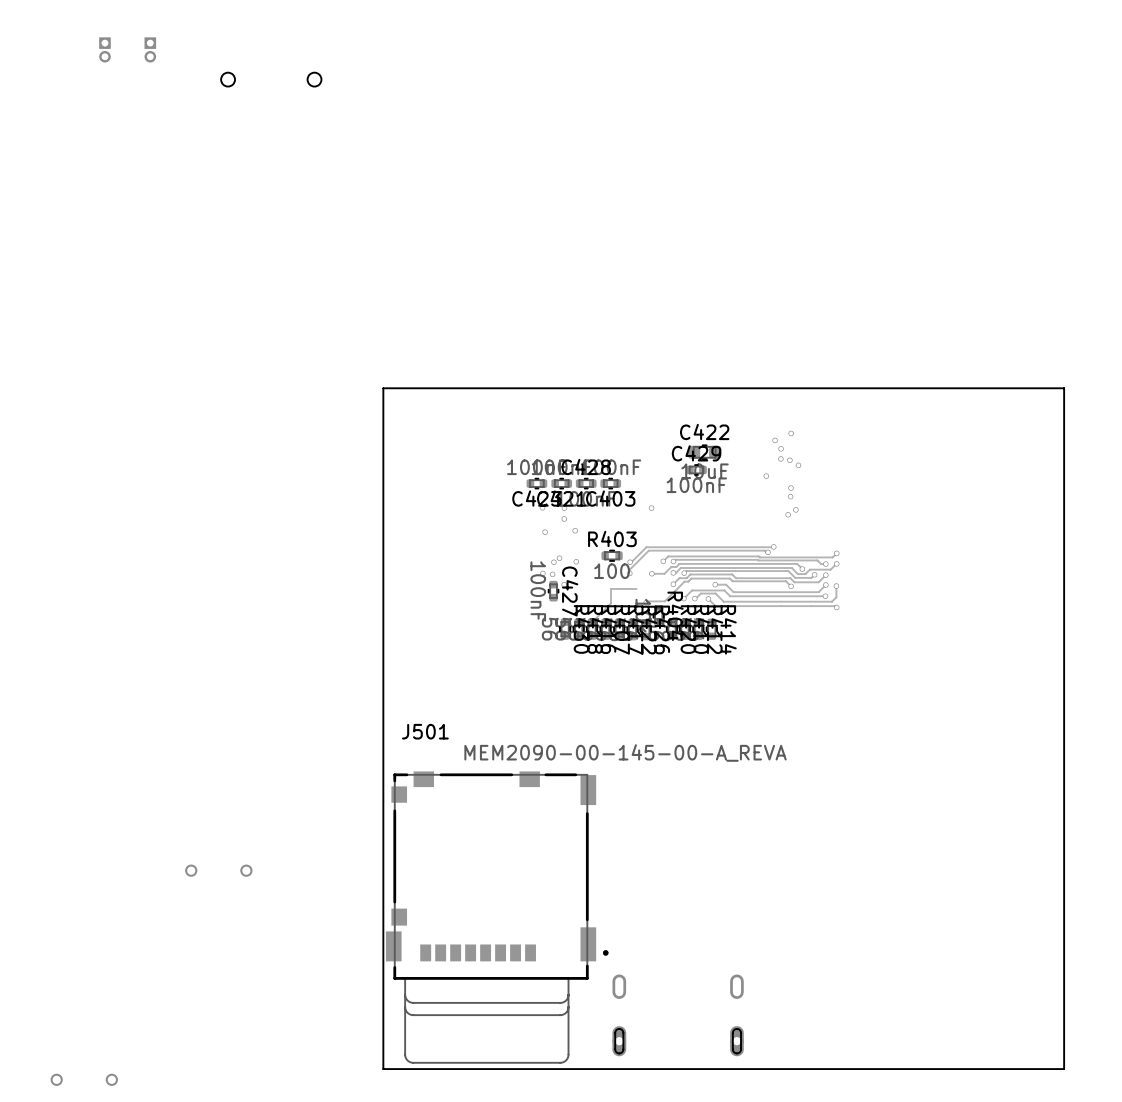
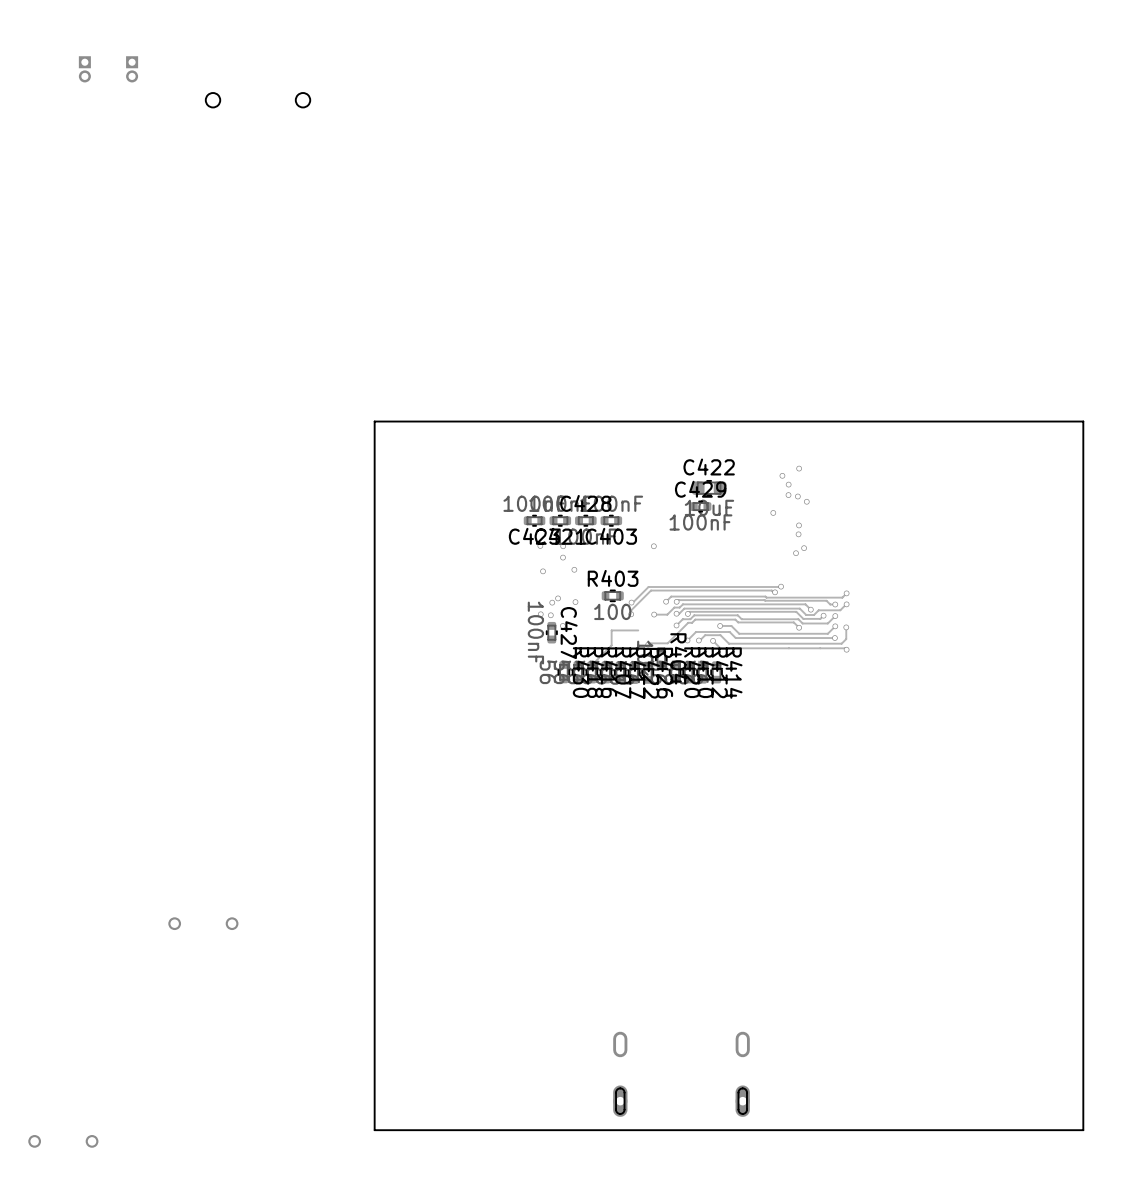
J501: MEM2090-00-145-00-A_REVA (497, 917) -> none

